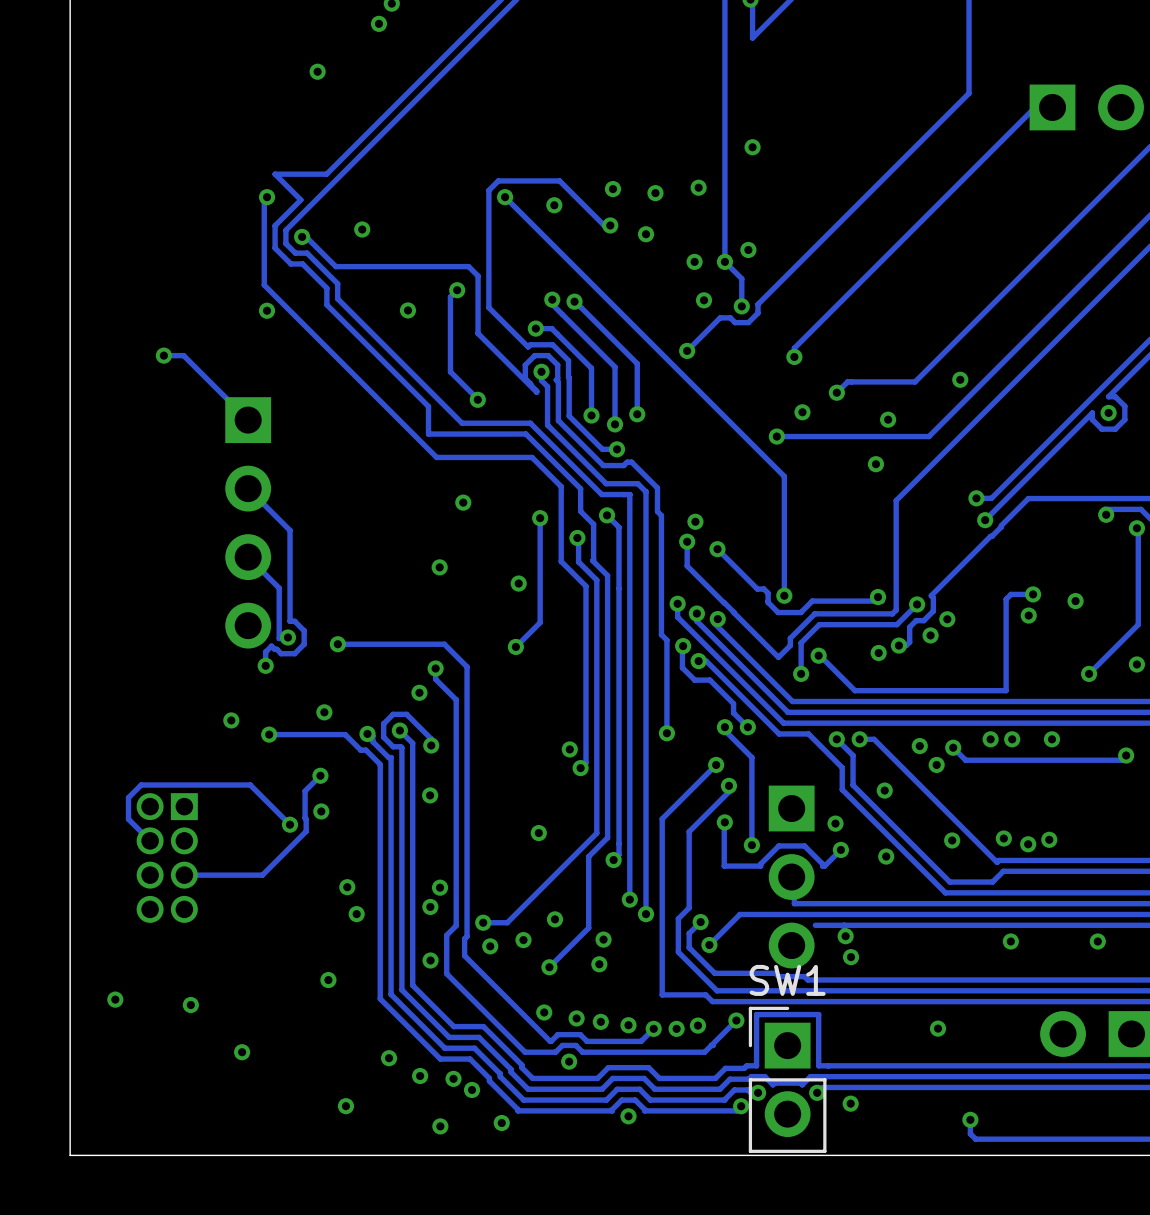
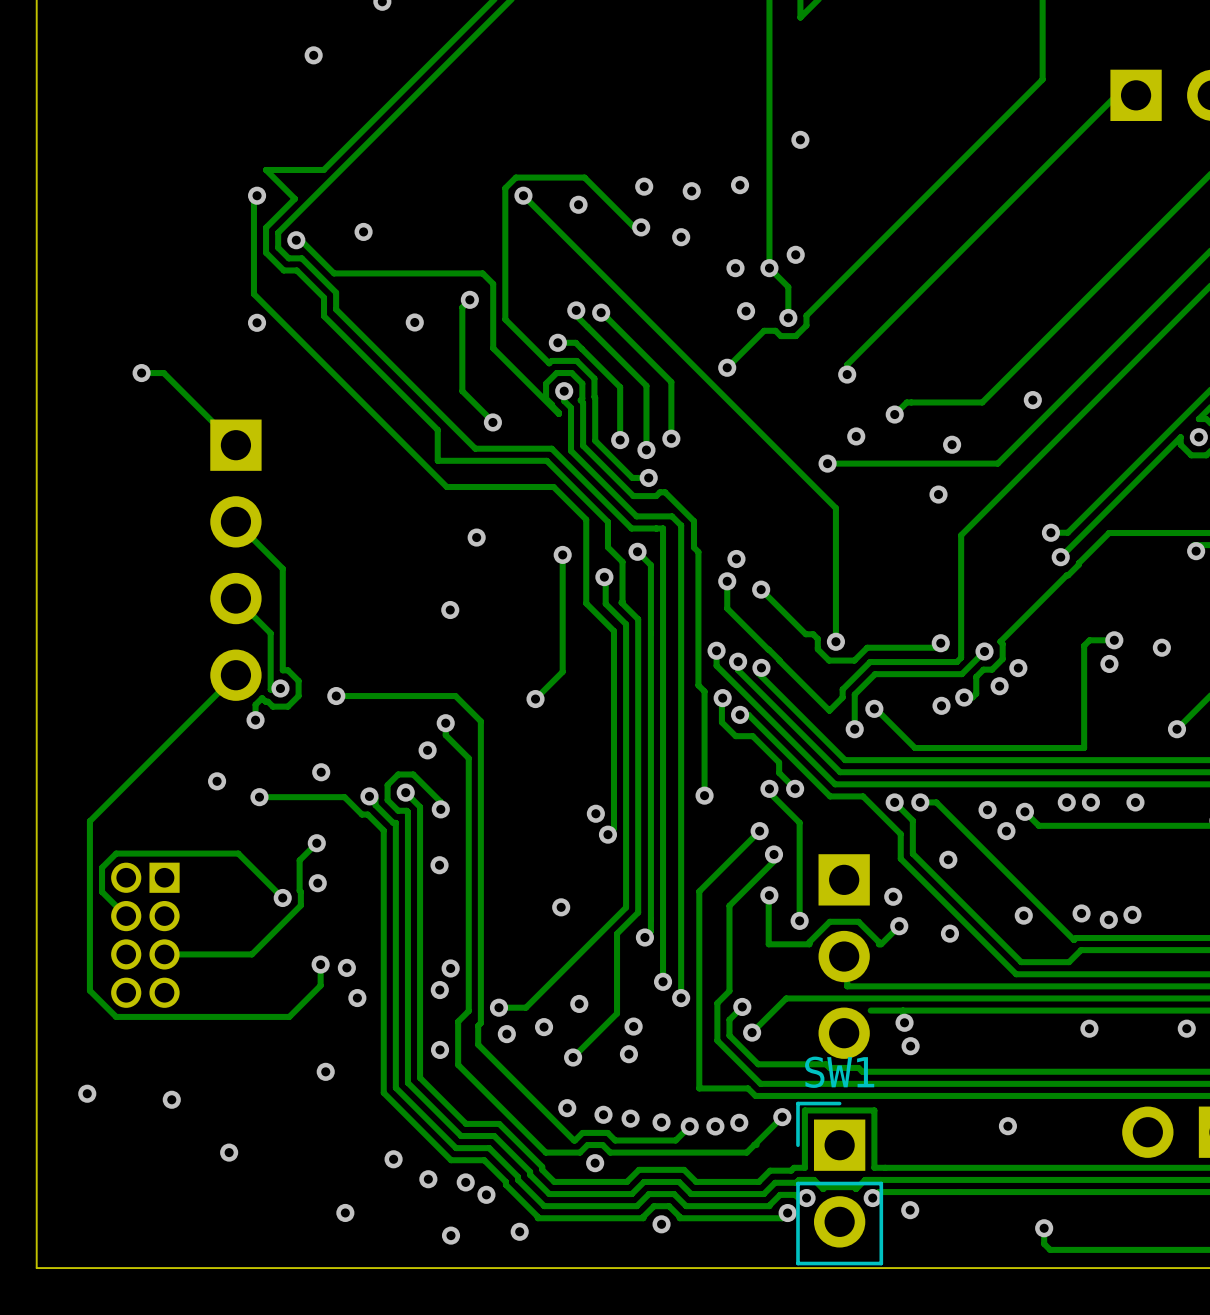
via: (518, 583) -> none
track: none -> (235, 675) (89, 821) (89, 990) (116, 1016) (289, 1016) (320, 985) (320, 964)
via: none -> (320, 964)

